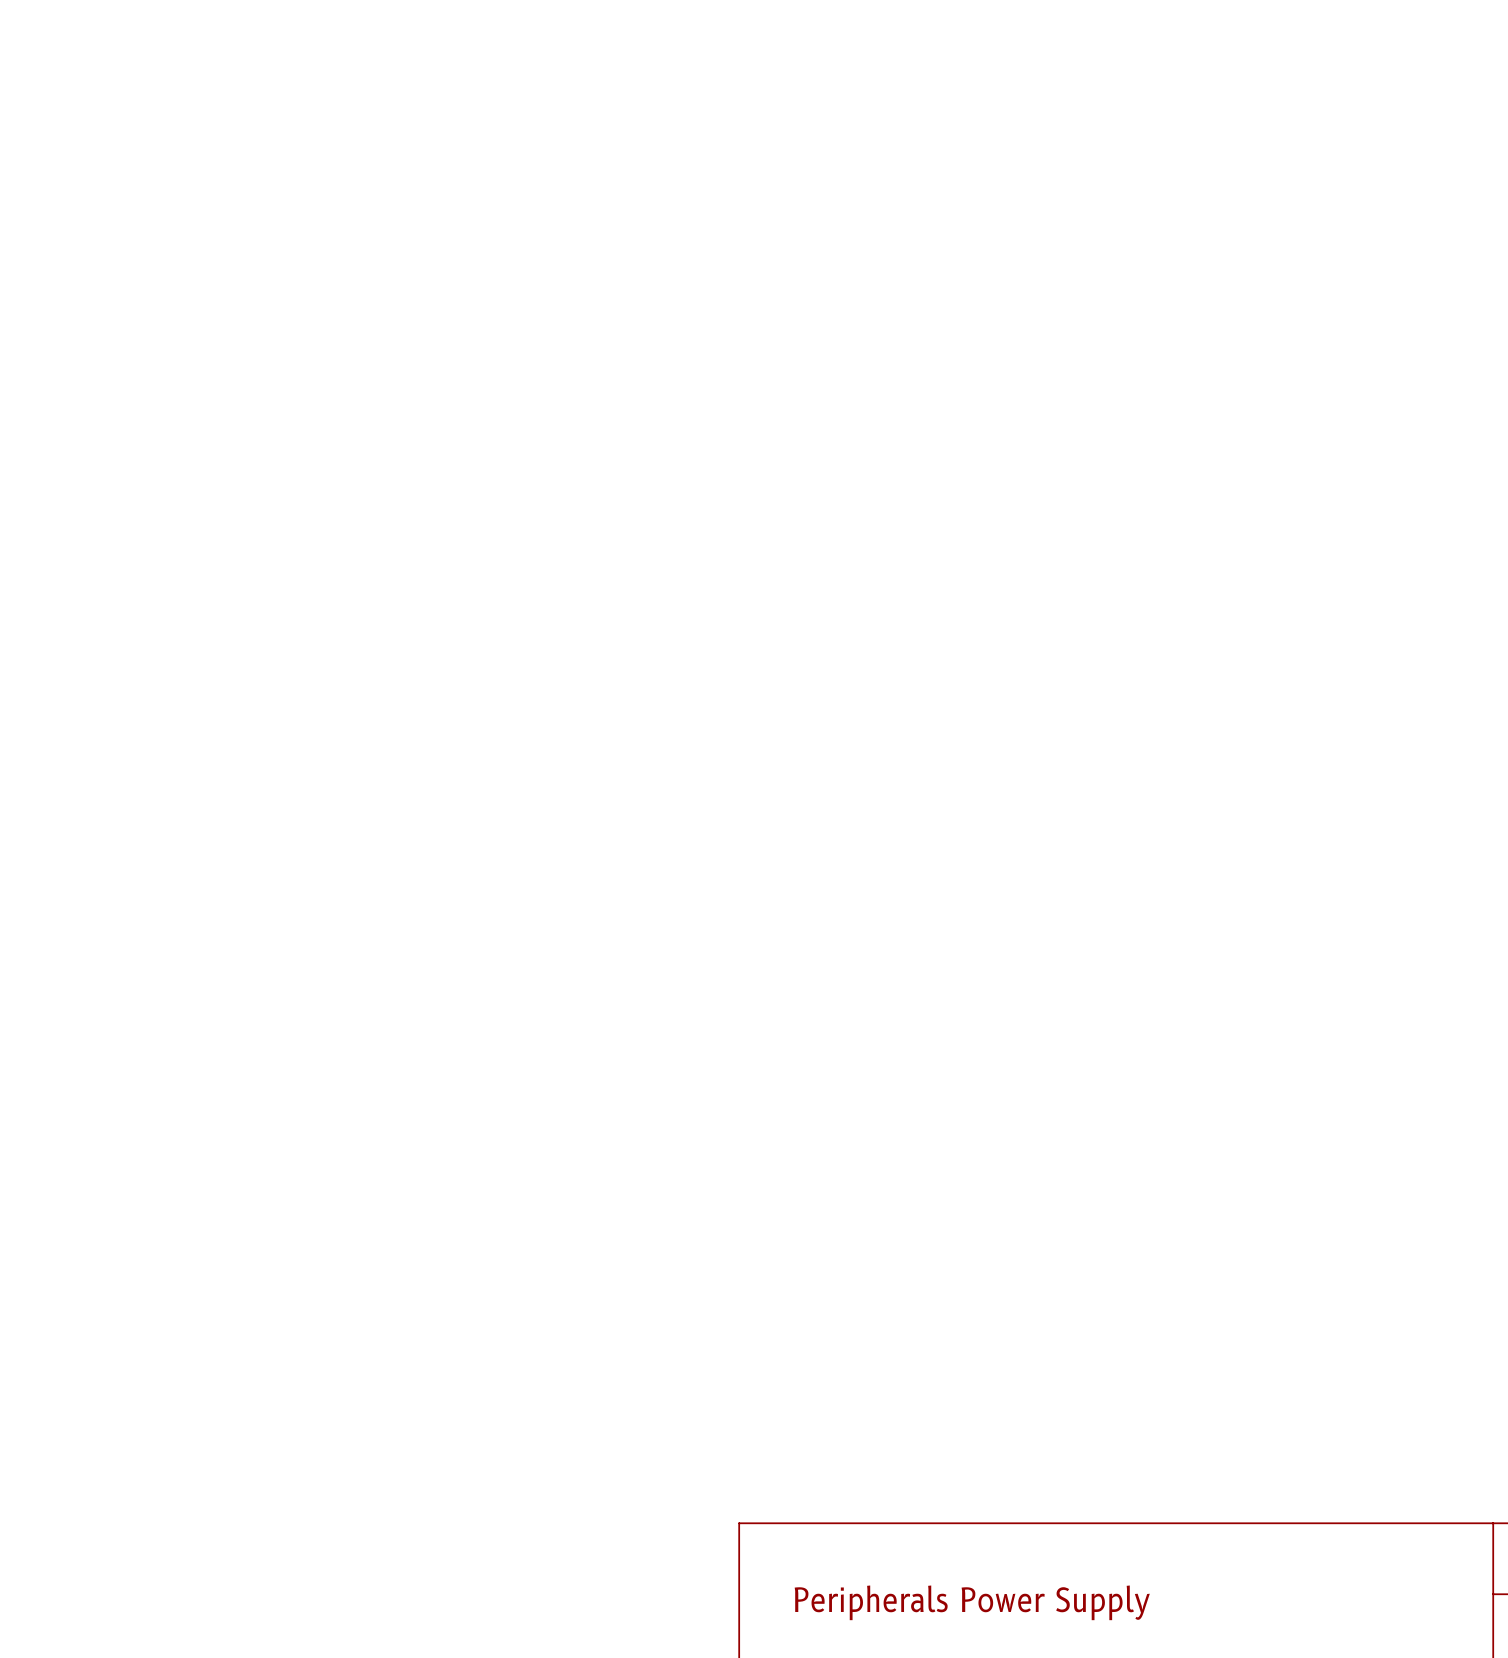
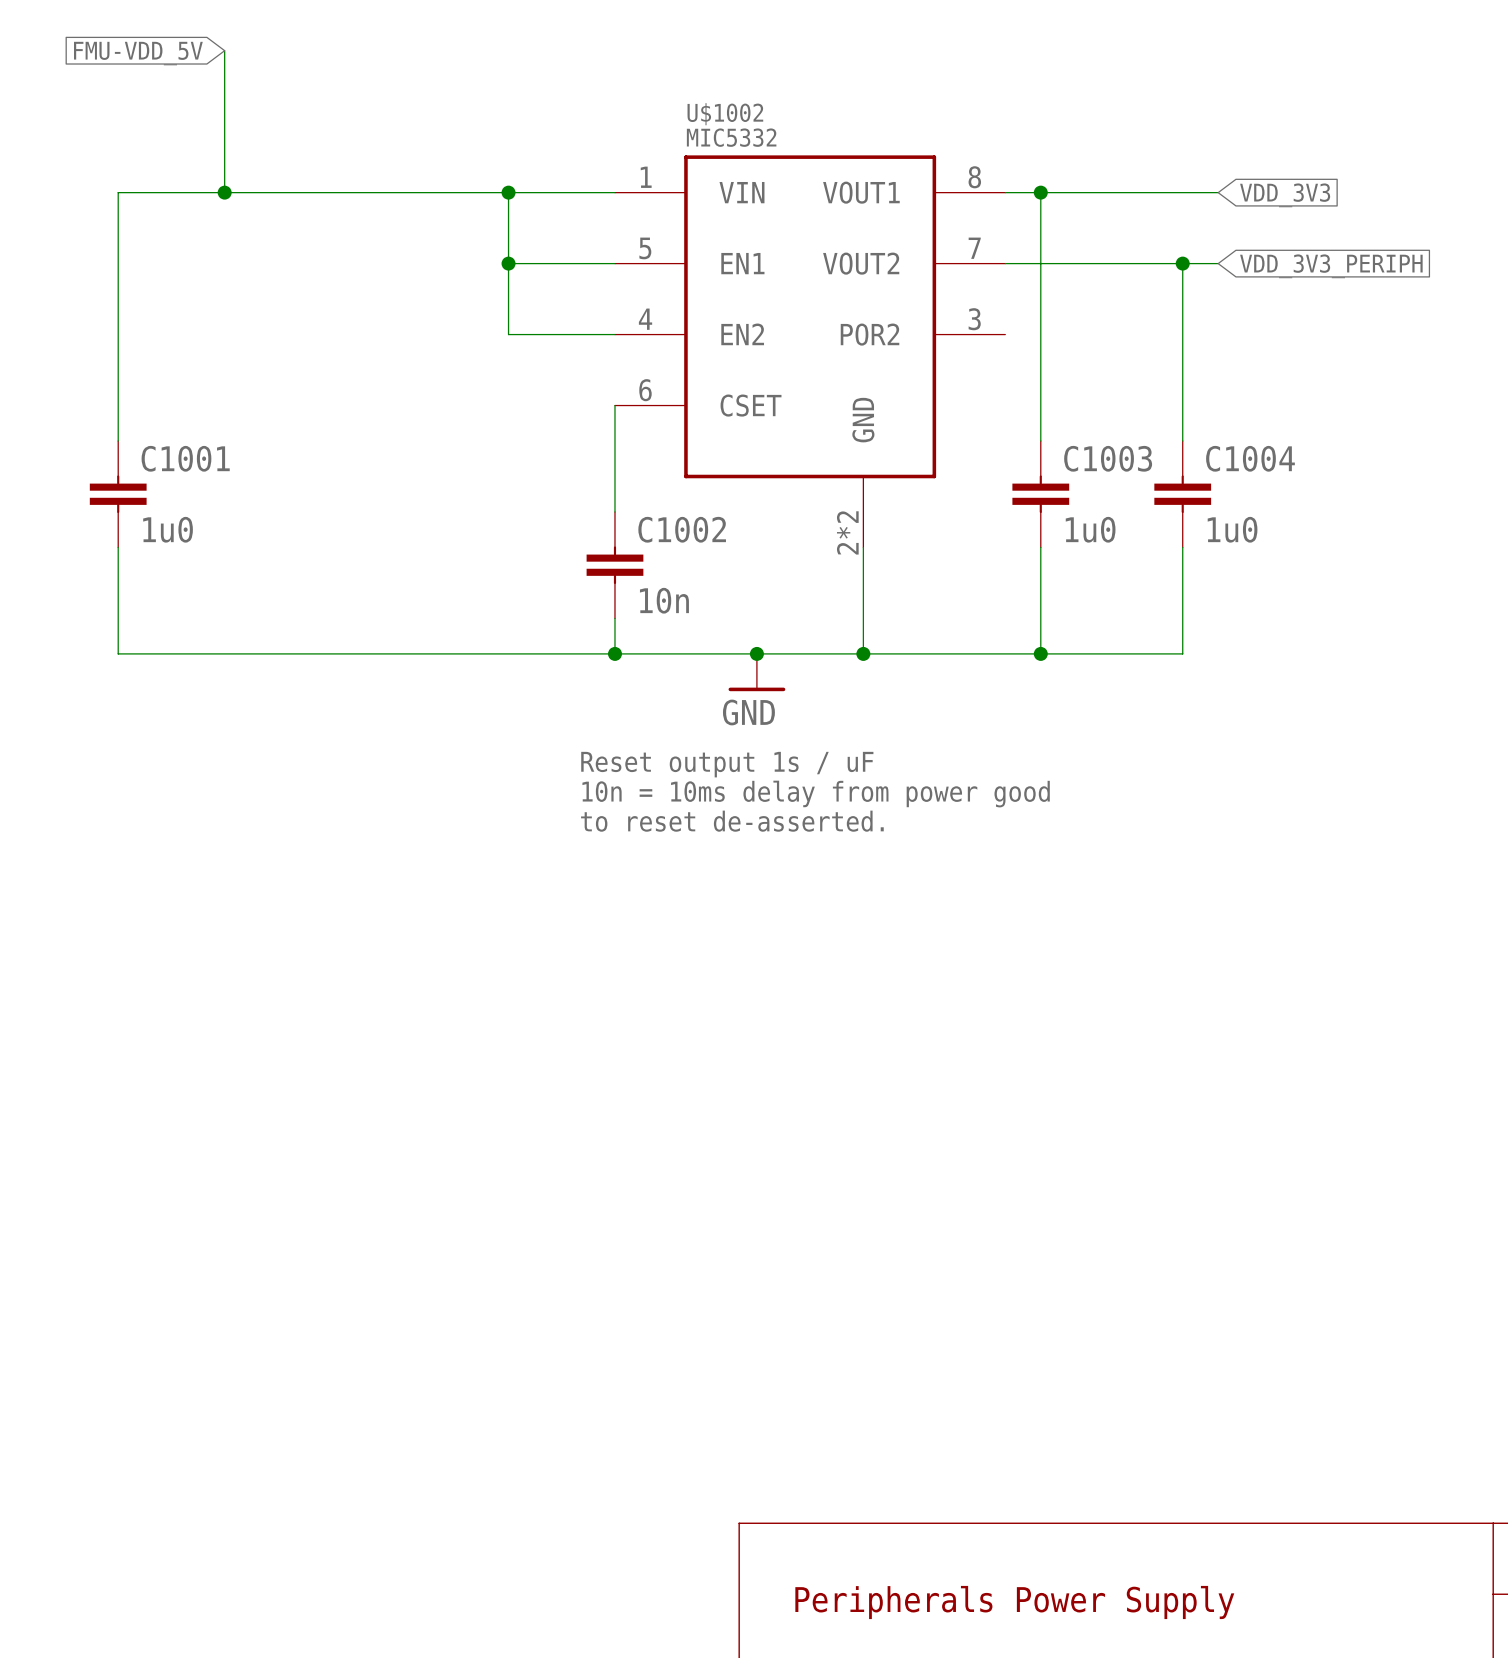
wire: none -> (224, 50) (224, 192)
global label: none -> FMU-VDD_5V (138, 53)
junction: none -> (224, 192)
wire: none -> (508, 192) (508, 334) (614, 334)
junction: none -> (508, 192)
wire: none -> (614, 192) (118, 192) (118, 441)
wire: none -> (1005, 192) (1218, 192)
wire: none -> (1040, 192) (1040, 441)
junction: none -> (1040, 192)
global label: none -> VDD_3V3 (1285, 195)
wire: none -> (508, 263) (614, 263)
junction: none -> (508, 263)
wire: none -> (1005, 263) (1218, 263)
wire: none -> (1182, 263) (1182, 441)
junction: none -> (1182, 263)
global label: none -> VDD_3V3_PERIPH (1331, 266)
U$1002: none -> MIC5332 (810, 351)
wire: none -> (614, 405) (614, 511)
C1001: none -> 1u0 (118, 494)
C1003: none -> 1u0 (1040, 494)
C1004: none -> 1u0 (1182, 494)
wire: none -> (118, 547) (118, 653) (1182, 653) (1182, 547)
wire: none -> (863, 547) (863, 653)
wire: none -> (1040, 547) (1040, 653)
C1002: none -> 10n (614, 565)
wire: none -> (614, 618) (614, 653)
junction: none -> (614, 653)
junction: none -> (756, 653)
junction: none -> (863, 653)
junction: none -> (1040, 653)
power symbol: none -> GND (756, 672)
text: none -> Reset output 1s / uF (727, 764)
text: none -> 10n = 10ms delay from power good (816, 794)
text: none -> to reset de-asserted. (732, 821)

